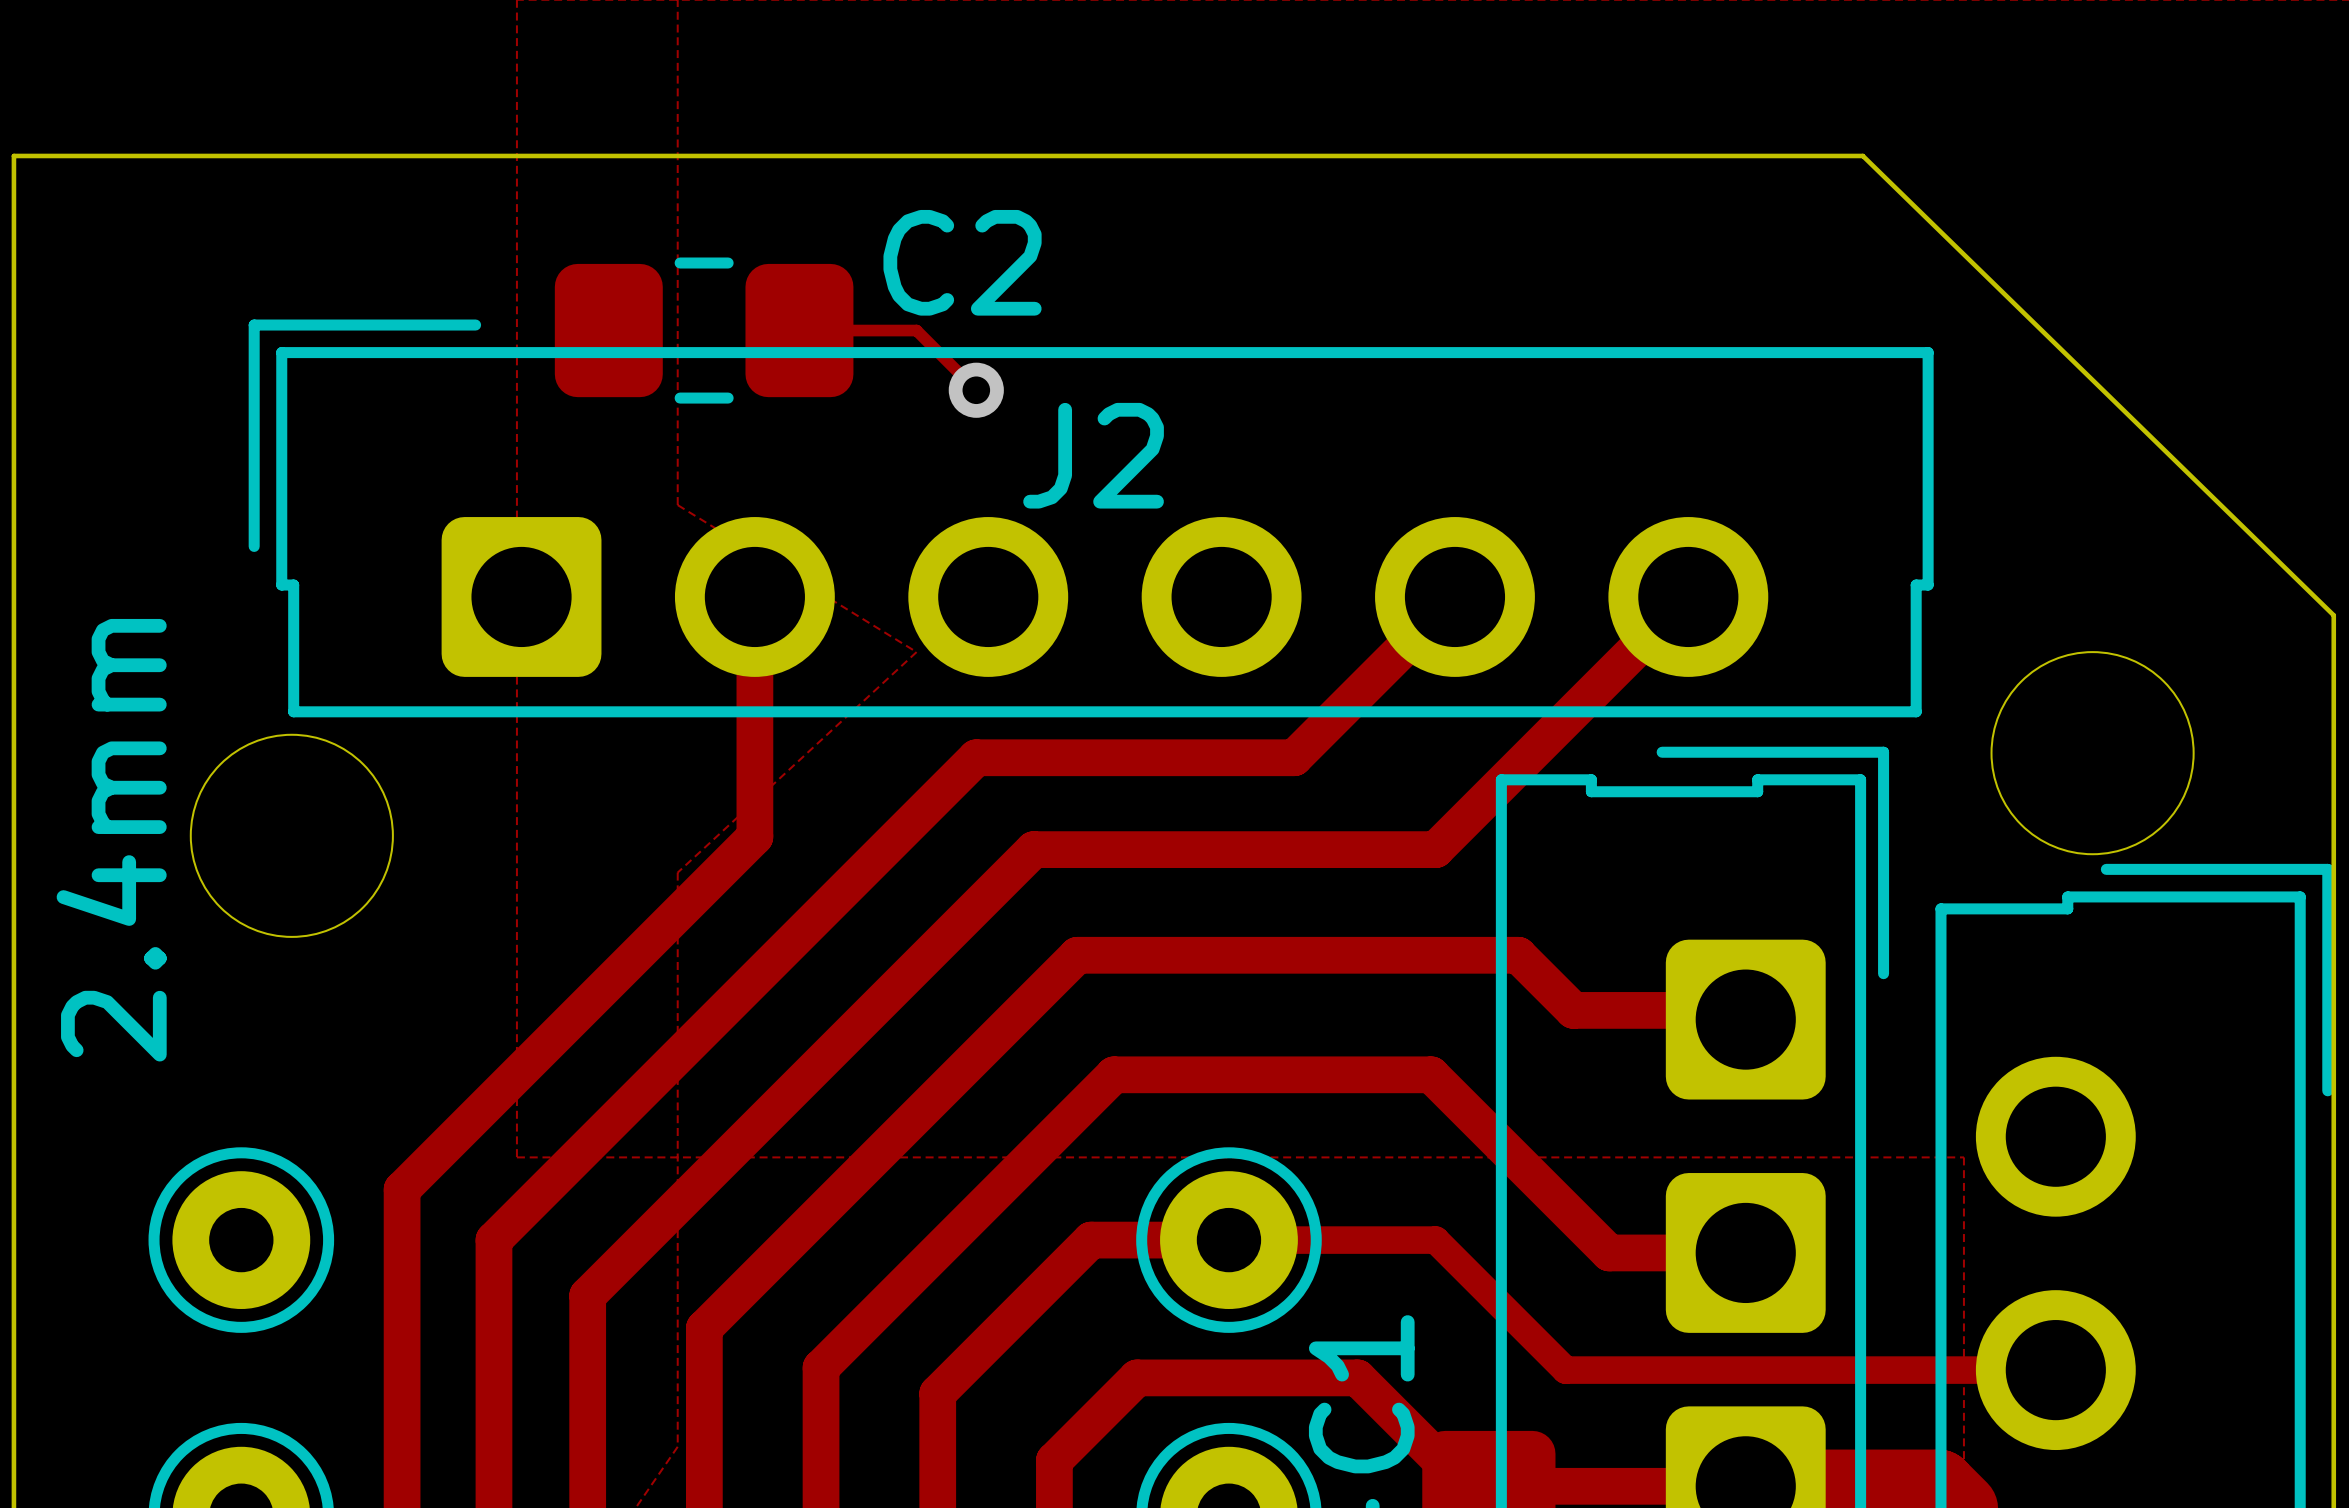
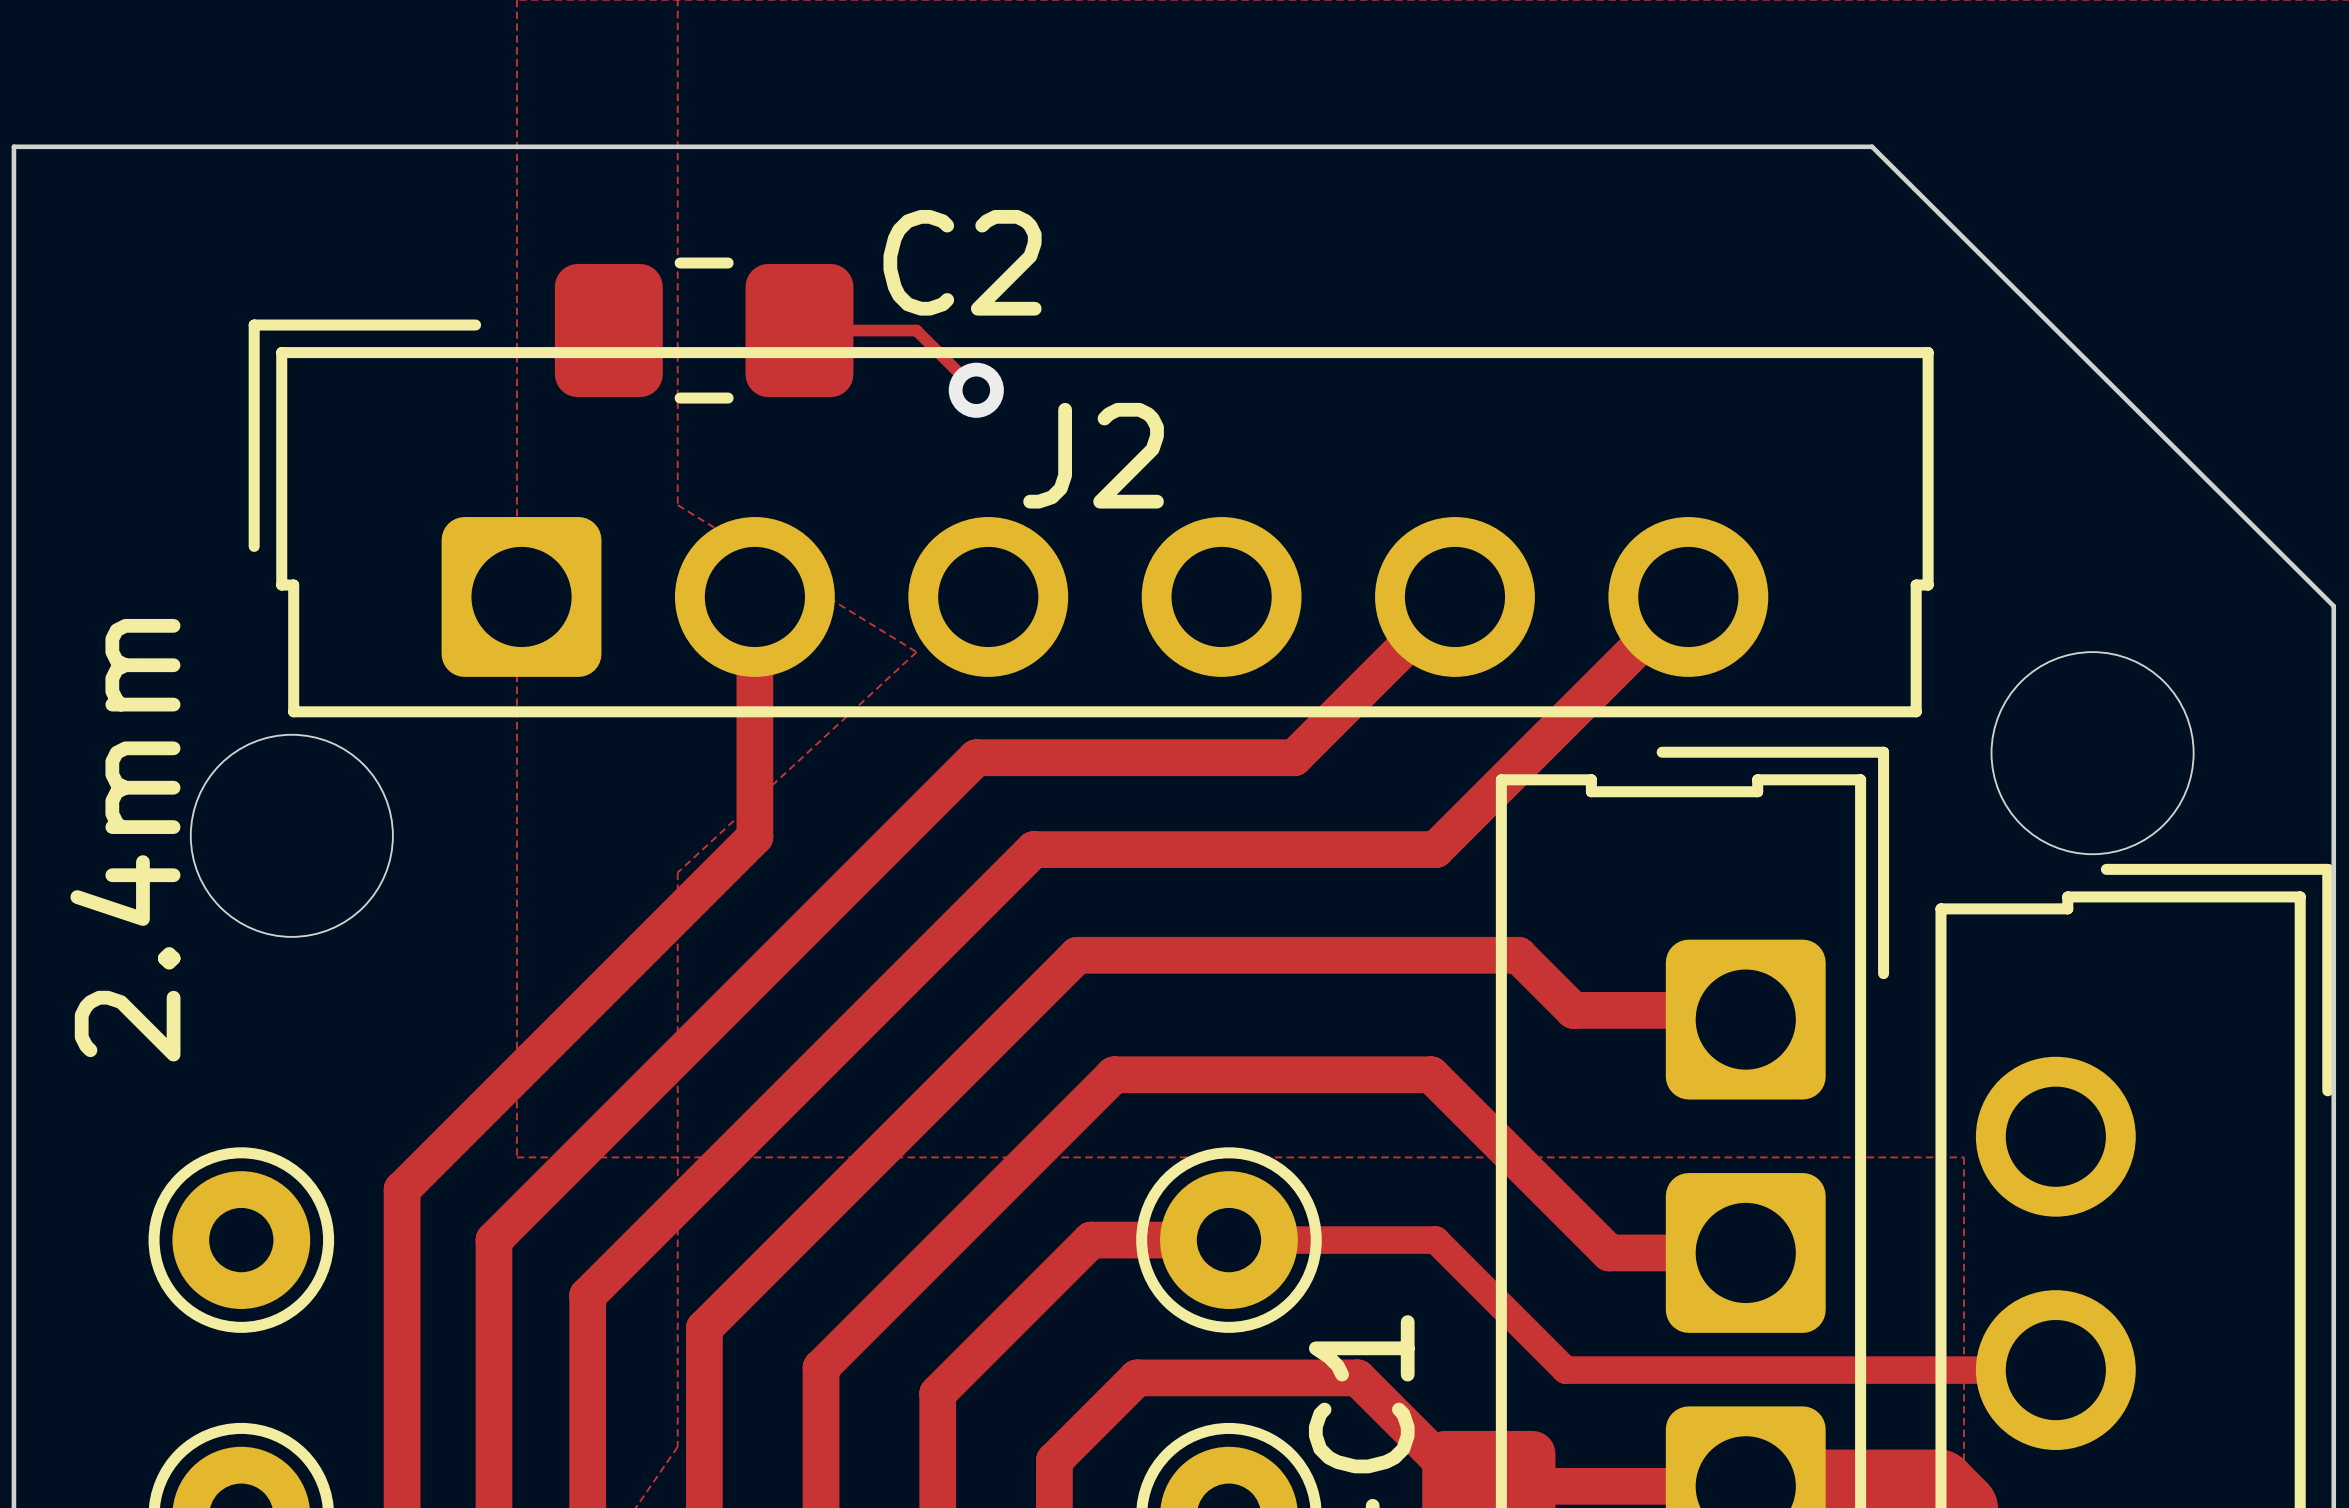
board edge: (13, 155) (1862, 155) (2333, 615) -> (13, 155) (13, 146) (1872, 146) (2333, 606) (2333, 615)
2.4mm name position: 2.4mm (111, 840) -> 2.4mm (125, 840)

